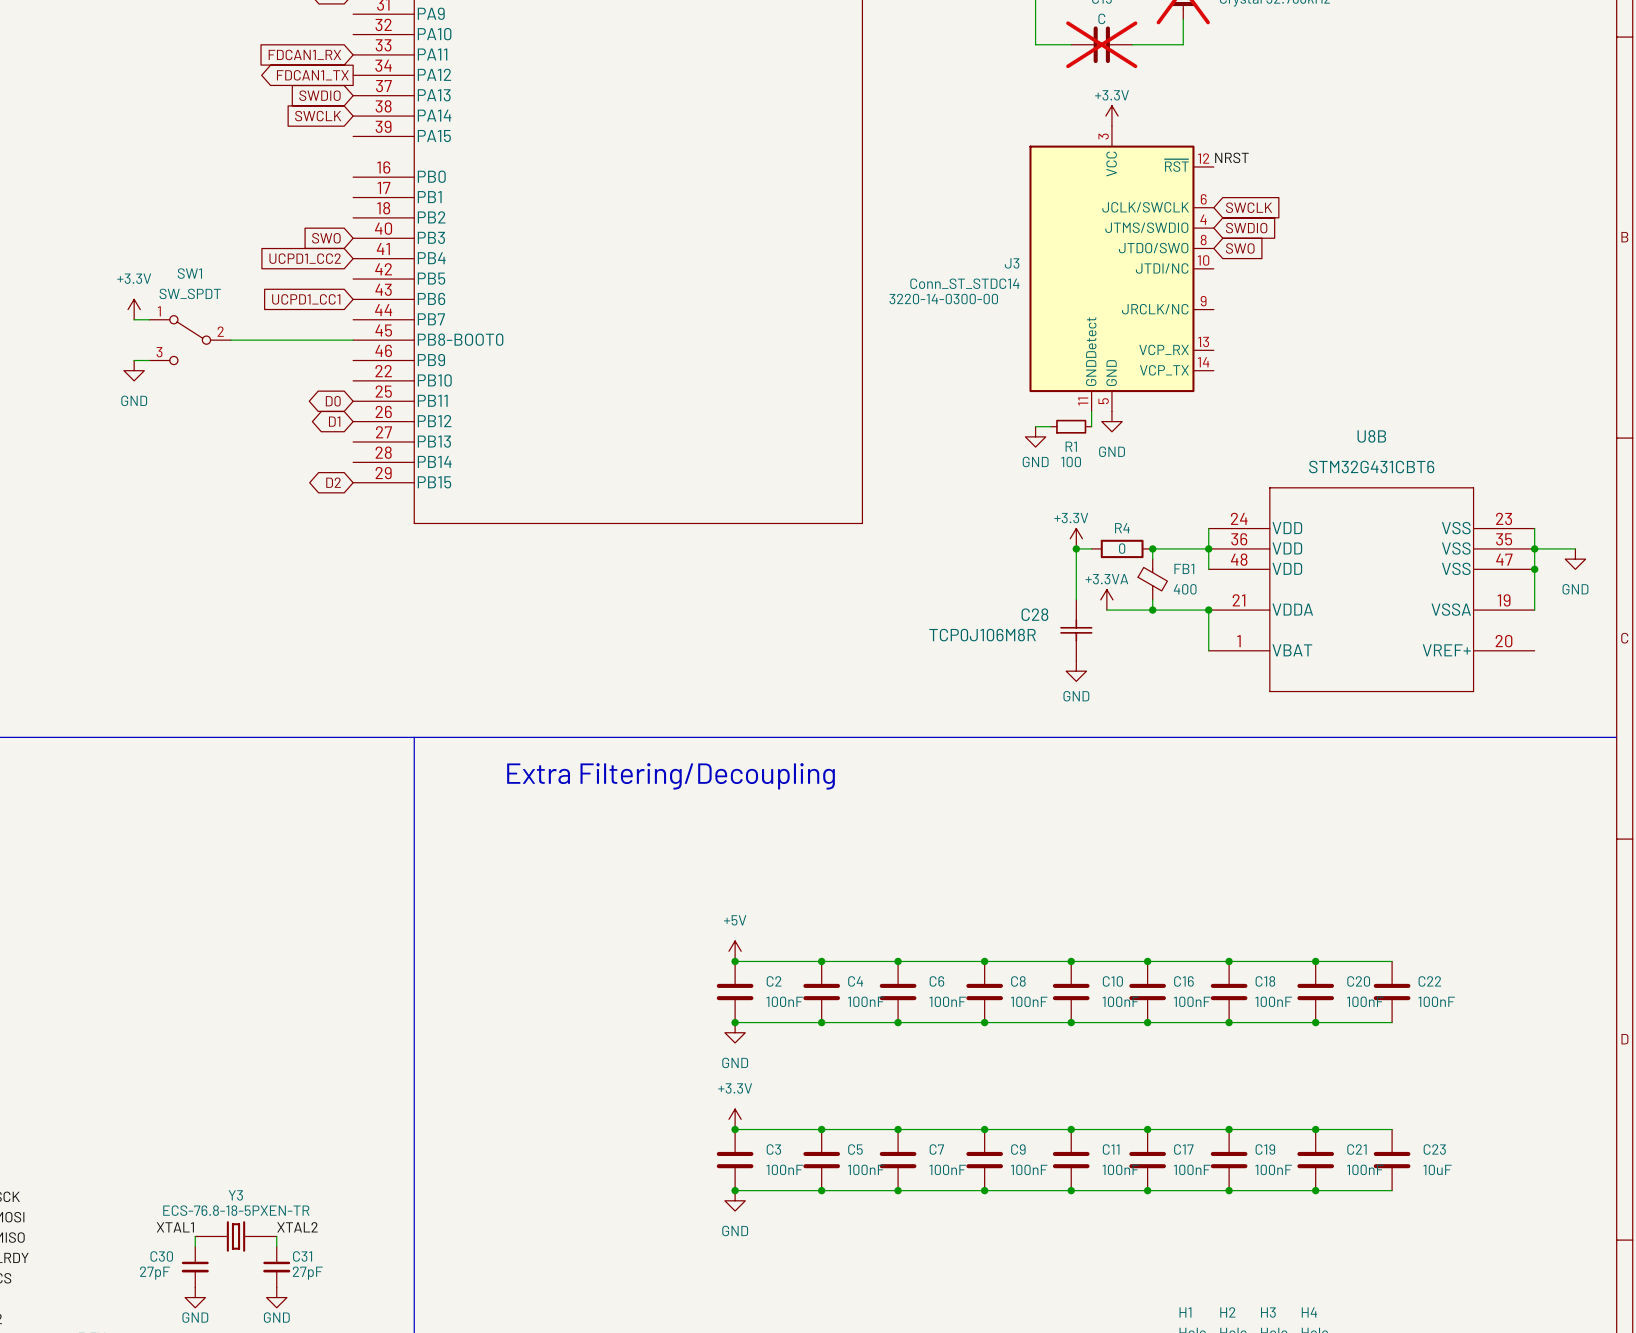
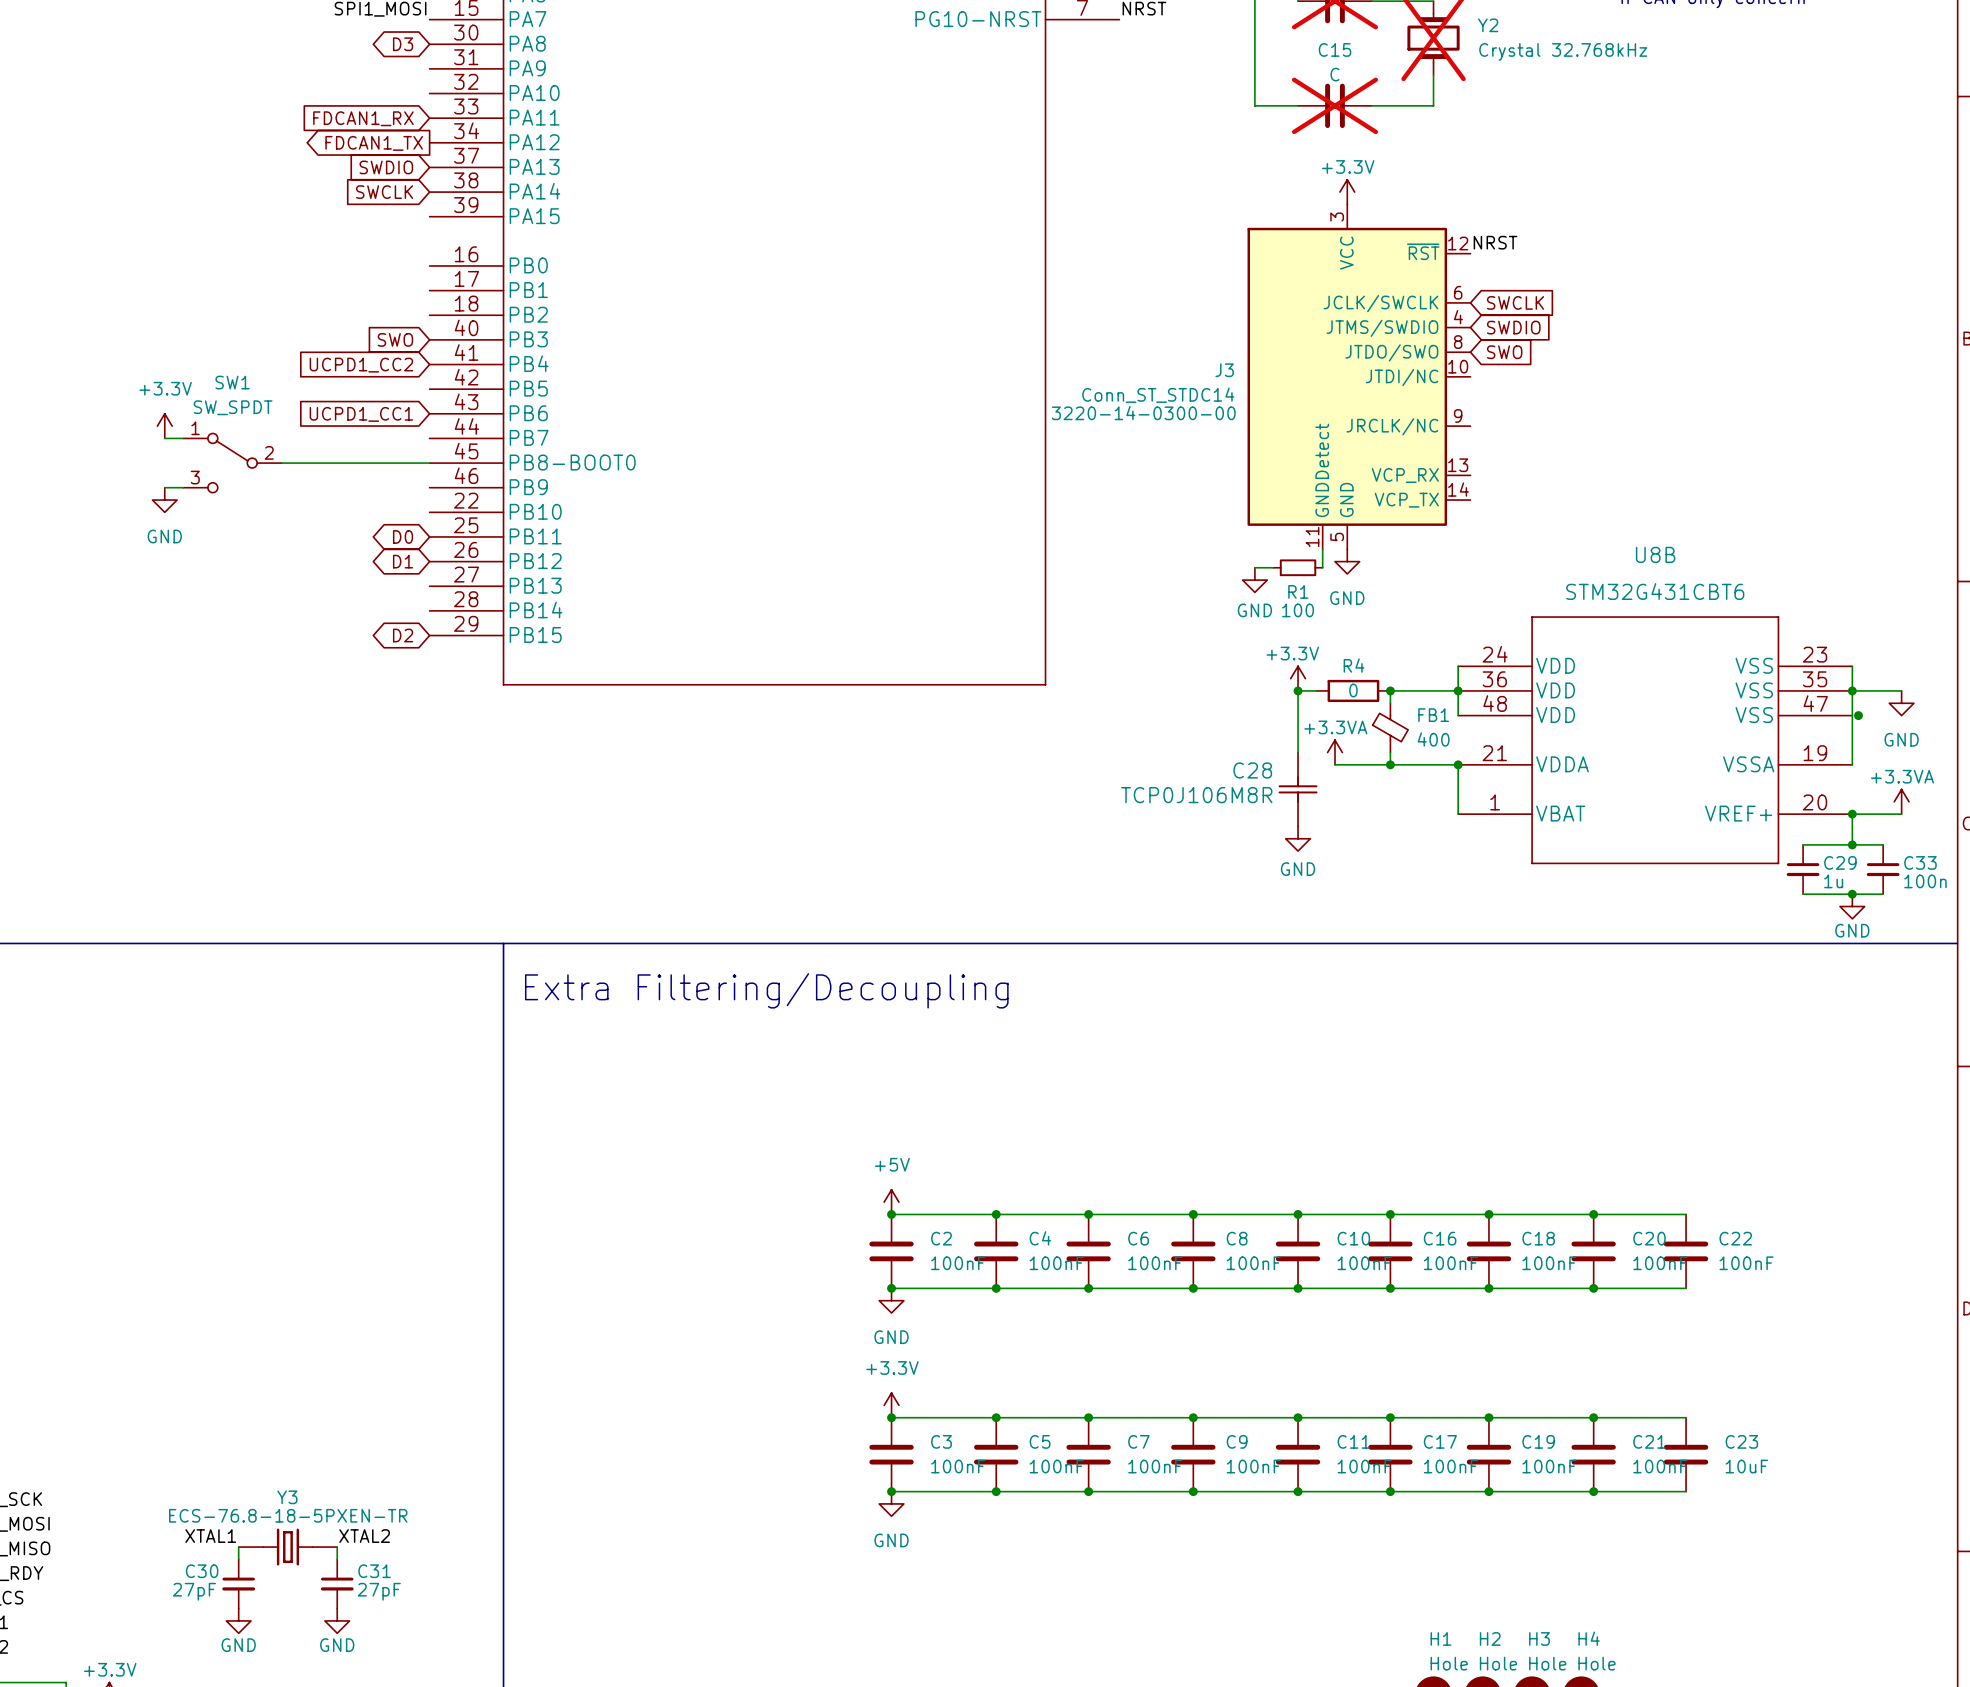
junction: none -> (1390, 690)
junction: none -> (1458, 690)
wire: (1208, 528) (1208, 569) -> (1458, 666) (1458, 715)
junction: none -> (1852, 690)
wire: (1534, 528) (1534, 610) -> (1852, 666) (1852, 764)
power symbol position: +3.3V (1076, 538) -> +3.3V (1298, 678)
junction position: (1076, 548) -> (1298, 690)
wire: (1091, 548) (1076, 548) (1076, 599) -> (1316, 690) (1298, 690) (1298, 752)
R4 position: (1122, 548) -> (1353, 690)
junction: (1152, 548) -> none
wire: (1208, 548) (1152, 548) (1152, 559) -> (1458, 690) (1390, 690) (1390, 703)
junction: (1208, 548) -> none
wire: (1534, 548) (1575, 548) -> (1852, 690) (1901, 690)
power symbol position: GND (1575, 559) -> GND (1901, 703)
junction: (1534, 569) -> none
FB1 position: (1152, 579) -> (1390, 727)
junction: none -> (1390, 764)
junction: none -> (1458, 764)
U8B position: (1371, 589) -> (1655, 740)
power symbol position: +3.3VA (1106, 599) -> +3.3VA (1334, 752)
wire: (1152, 599) (1152, 610) -> (1390, 752) (1390, 764)
wire: (1106, 610) (1208, 610) (1208, 650) -> (1334, 764) (1458, 764) (1458, 814)
junction: (1152, 610) -> none
junction: (1208, 610) -> none
power symbol: none -> +3.3VA (1901, 801)
C28 position: (1076, 630) -> (1298, 789)
junction: none -> (1852, 814)
wire: none -> (1901, 814) (1852, 814) (1852, 844)
wire: none -> (1803, 844) (1883, 844)
junction: none -> (1852, 844)
power symbol position: GND (1076, 671) -> GND (1298, 838)
C29: none -> 1u (1803, 869)
C33: none -> 100n (1883, 869)
wire: none -> (1803, 894) (1883, 894)
junction: none -> (1852, 894)
power symbol: none -> GND (1852, 906)

